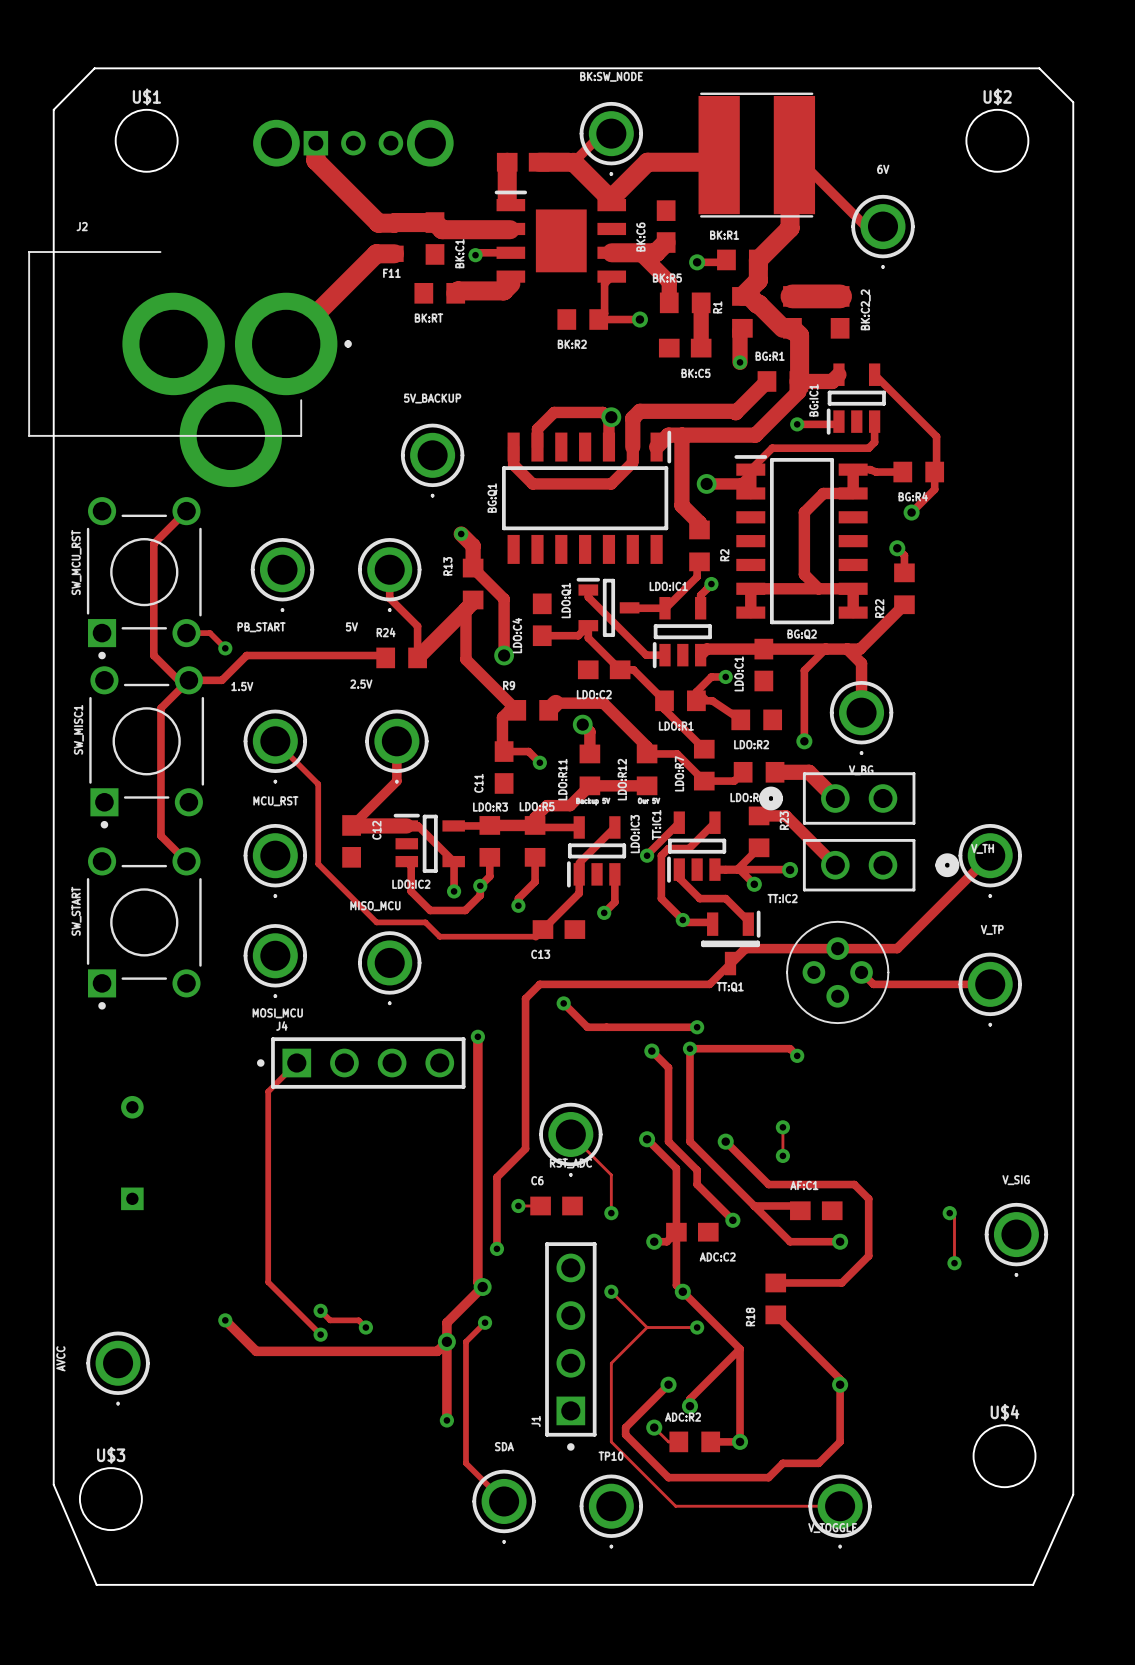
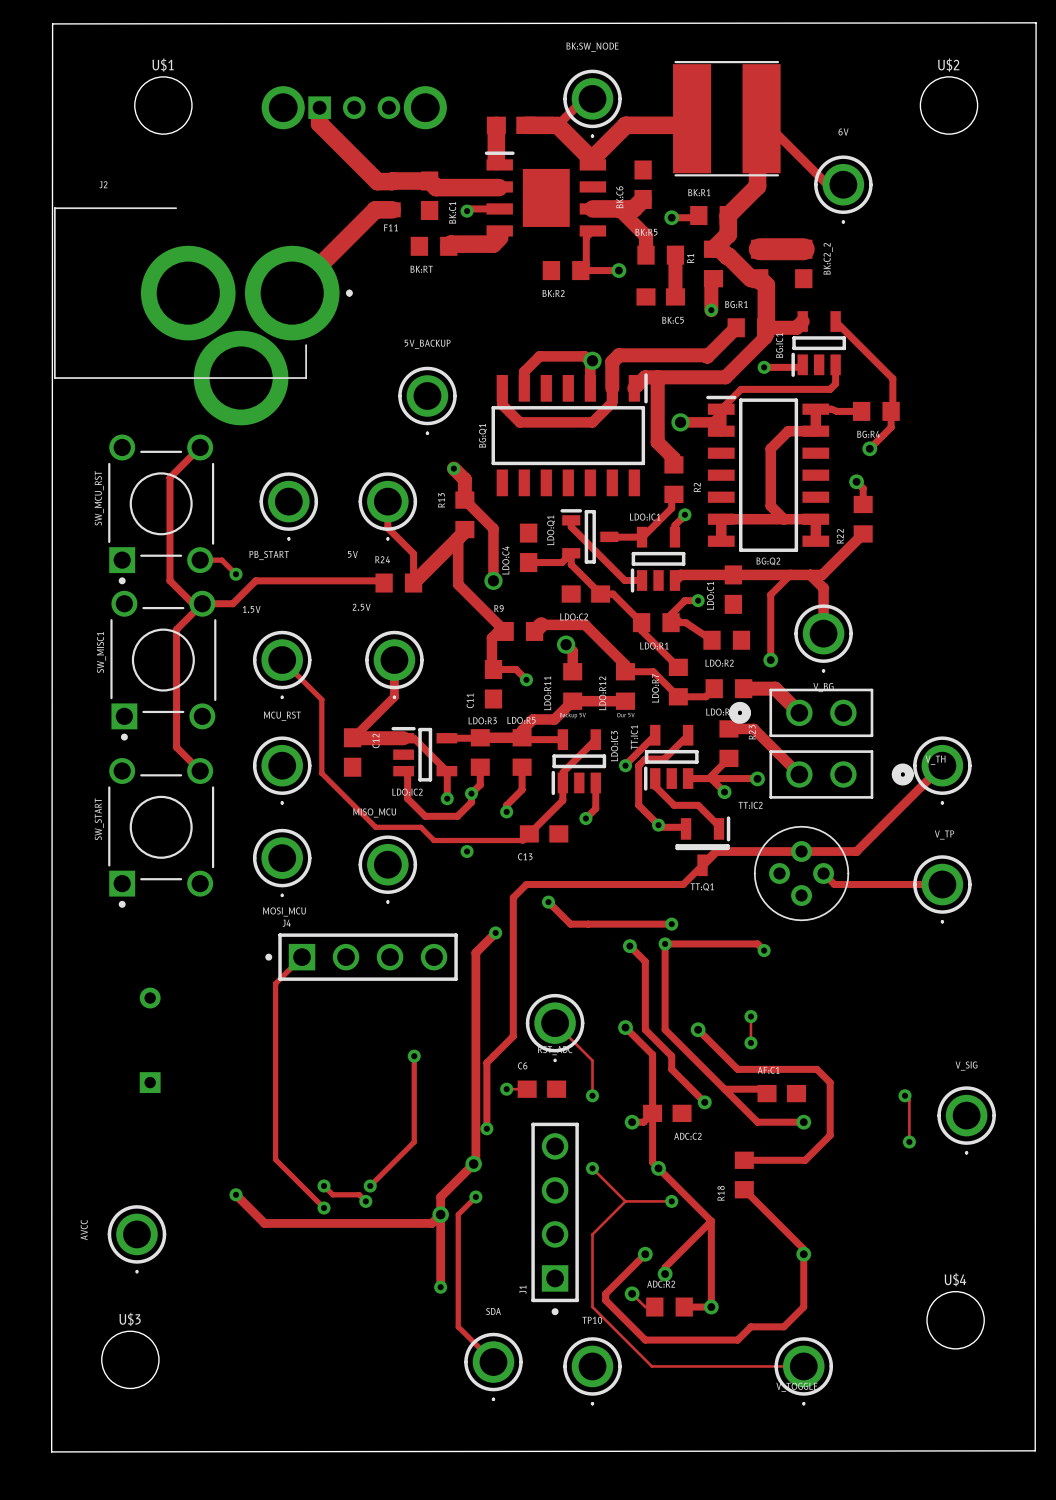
board edge: (94, 68) (1039, 68) (1073, 102) (1073, 1494) (1033, 1584) (96, 1584) (53, 1484) (53, 109) (94, 68) -> (1036, 22) (52, 23) (51, 1451) (1035, 1450) (1036, 22)
via: none -> (467, 851)
track: (477, 1036) (477, 1282) (482, 1287) -> (495, 932) (475, 952) (475, 1161) (473, 1164)
via position: (477, 1036) -> (495, 932)
track: none -> (414, 1056) (414, 1142) (370, 1186)
via: none -> (414, 1056)
via: none -> (370, 1186)

